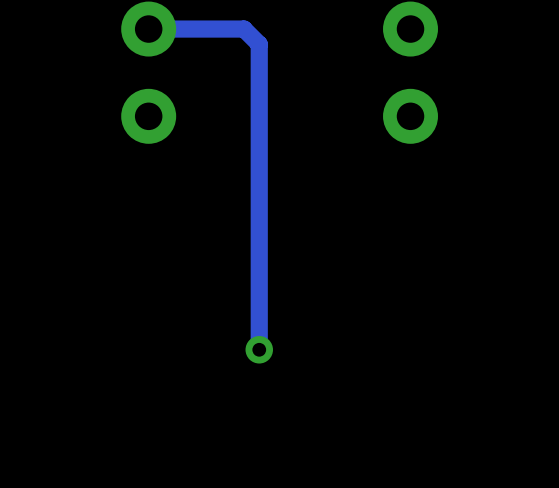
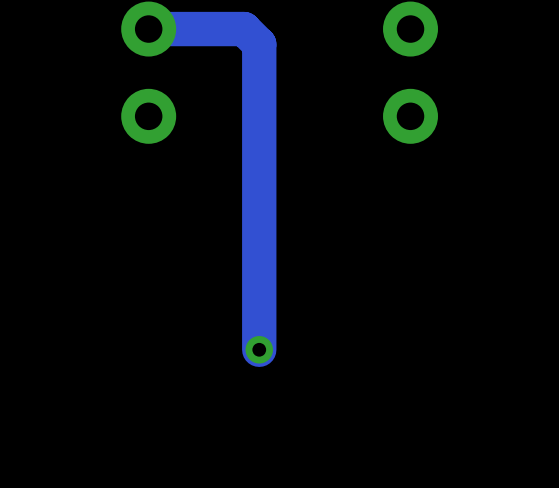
track width: thin (148, 29) (244, 29) (259, 44) (259, 349) -> thick (148, 29) (244, 29) (259, 44) (259, 349)

